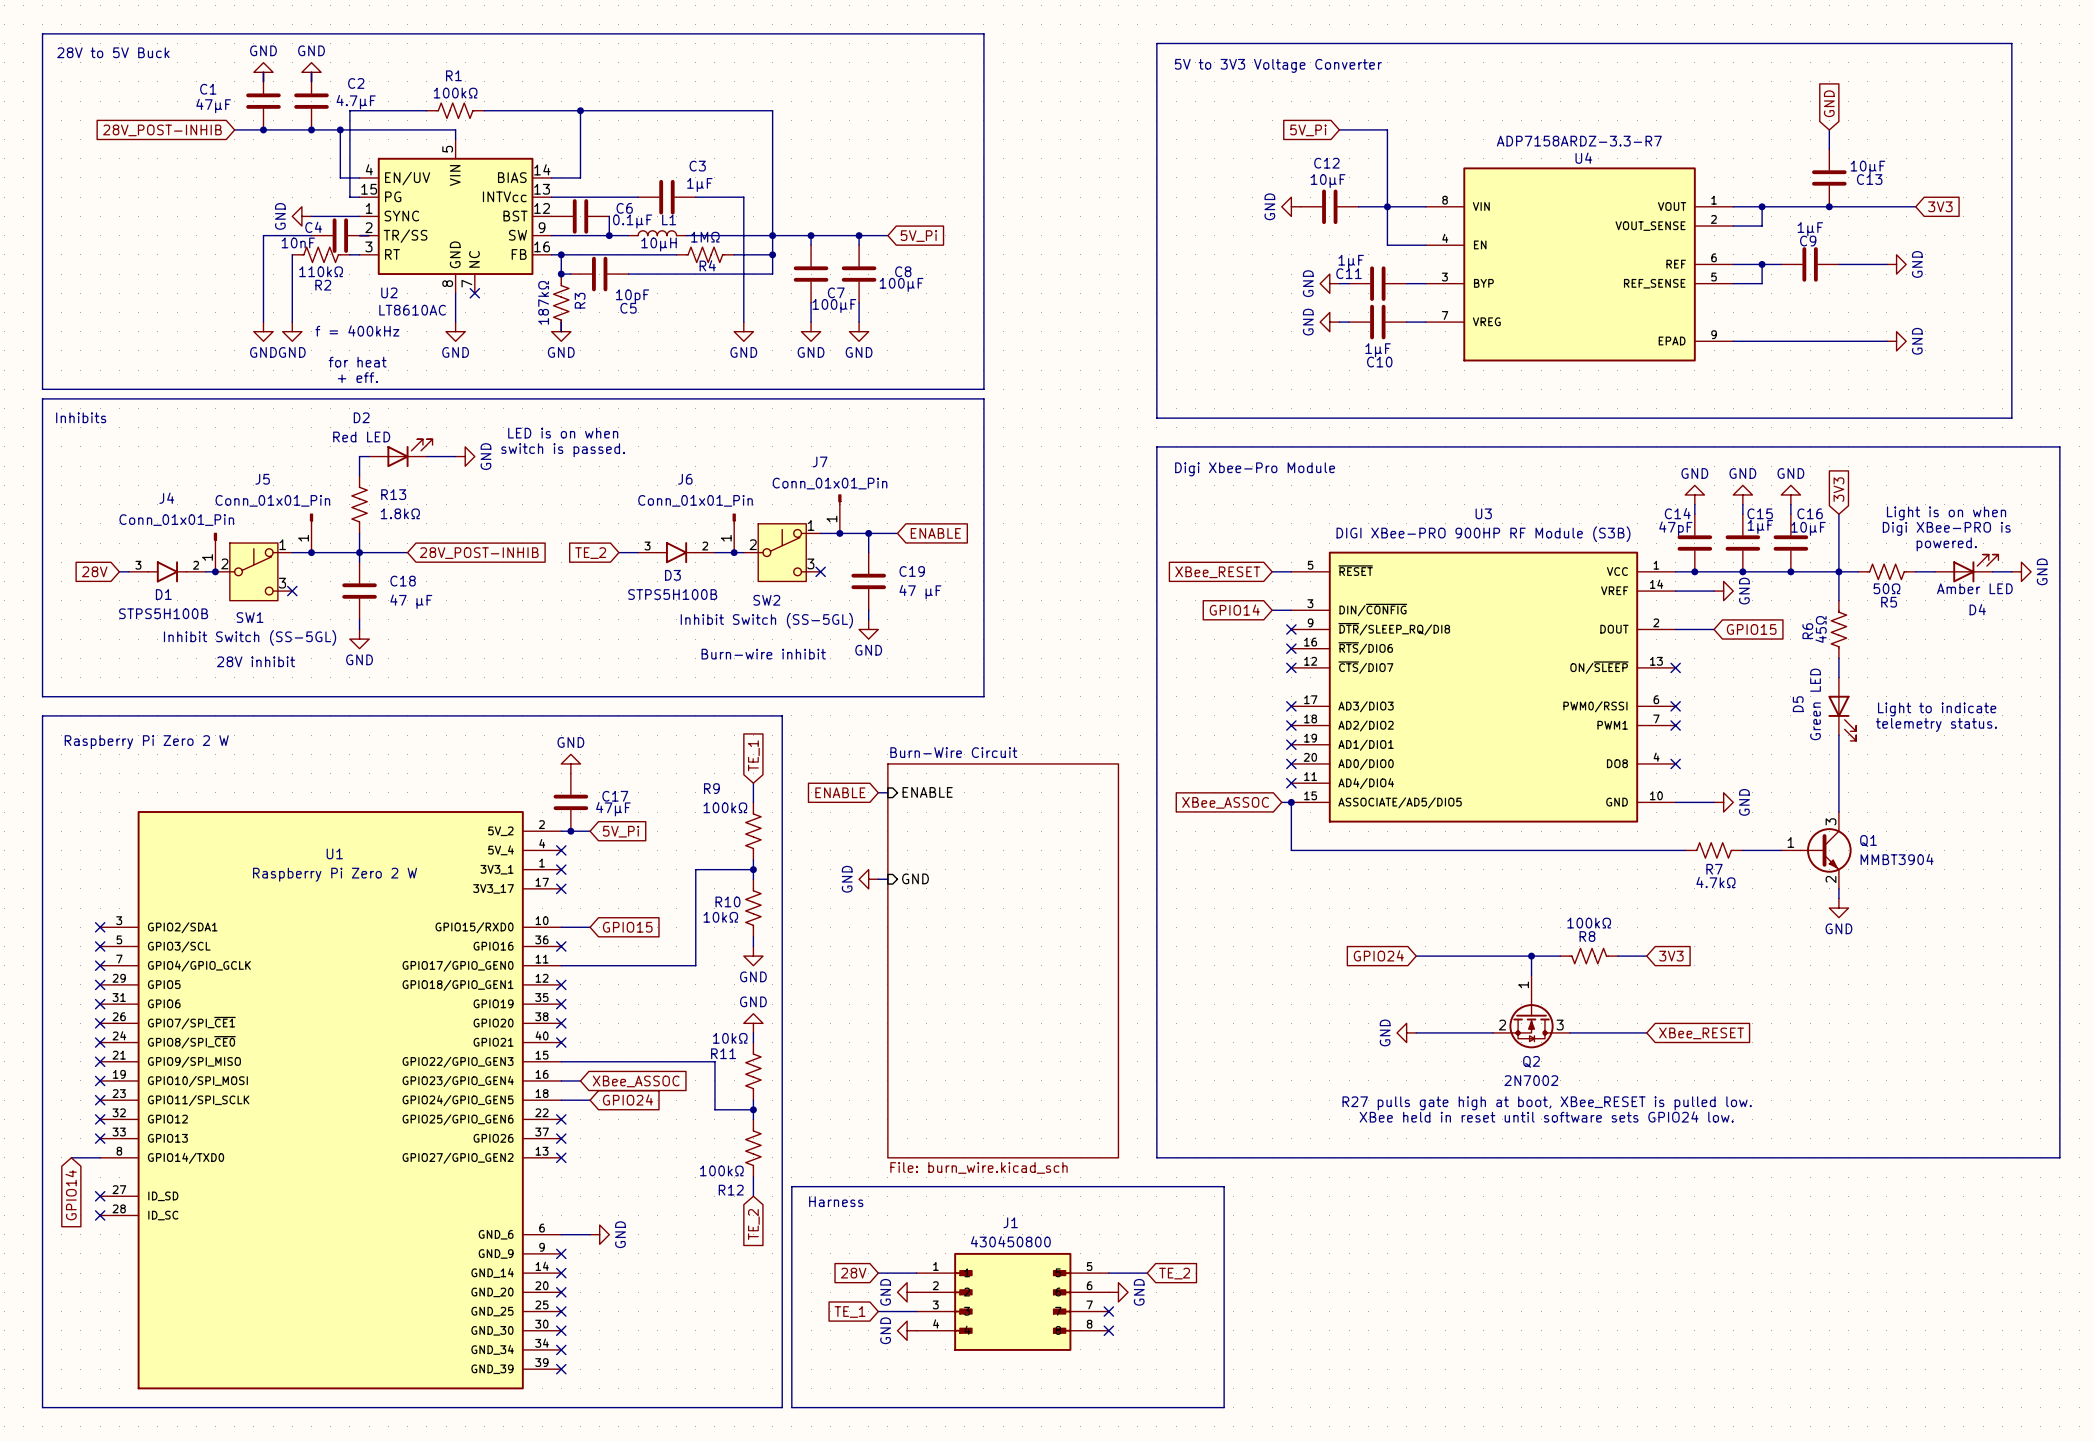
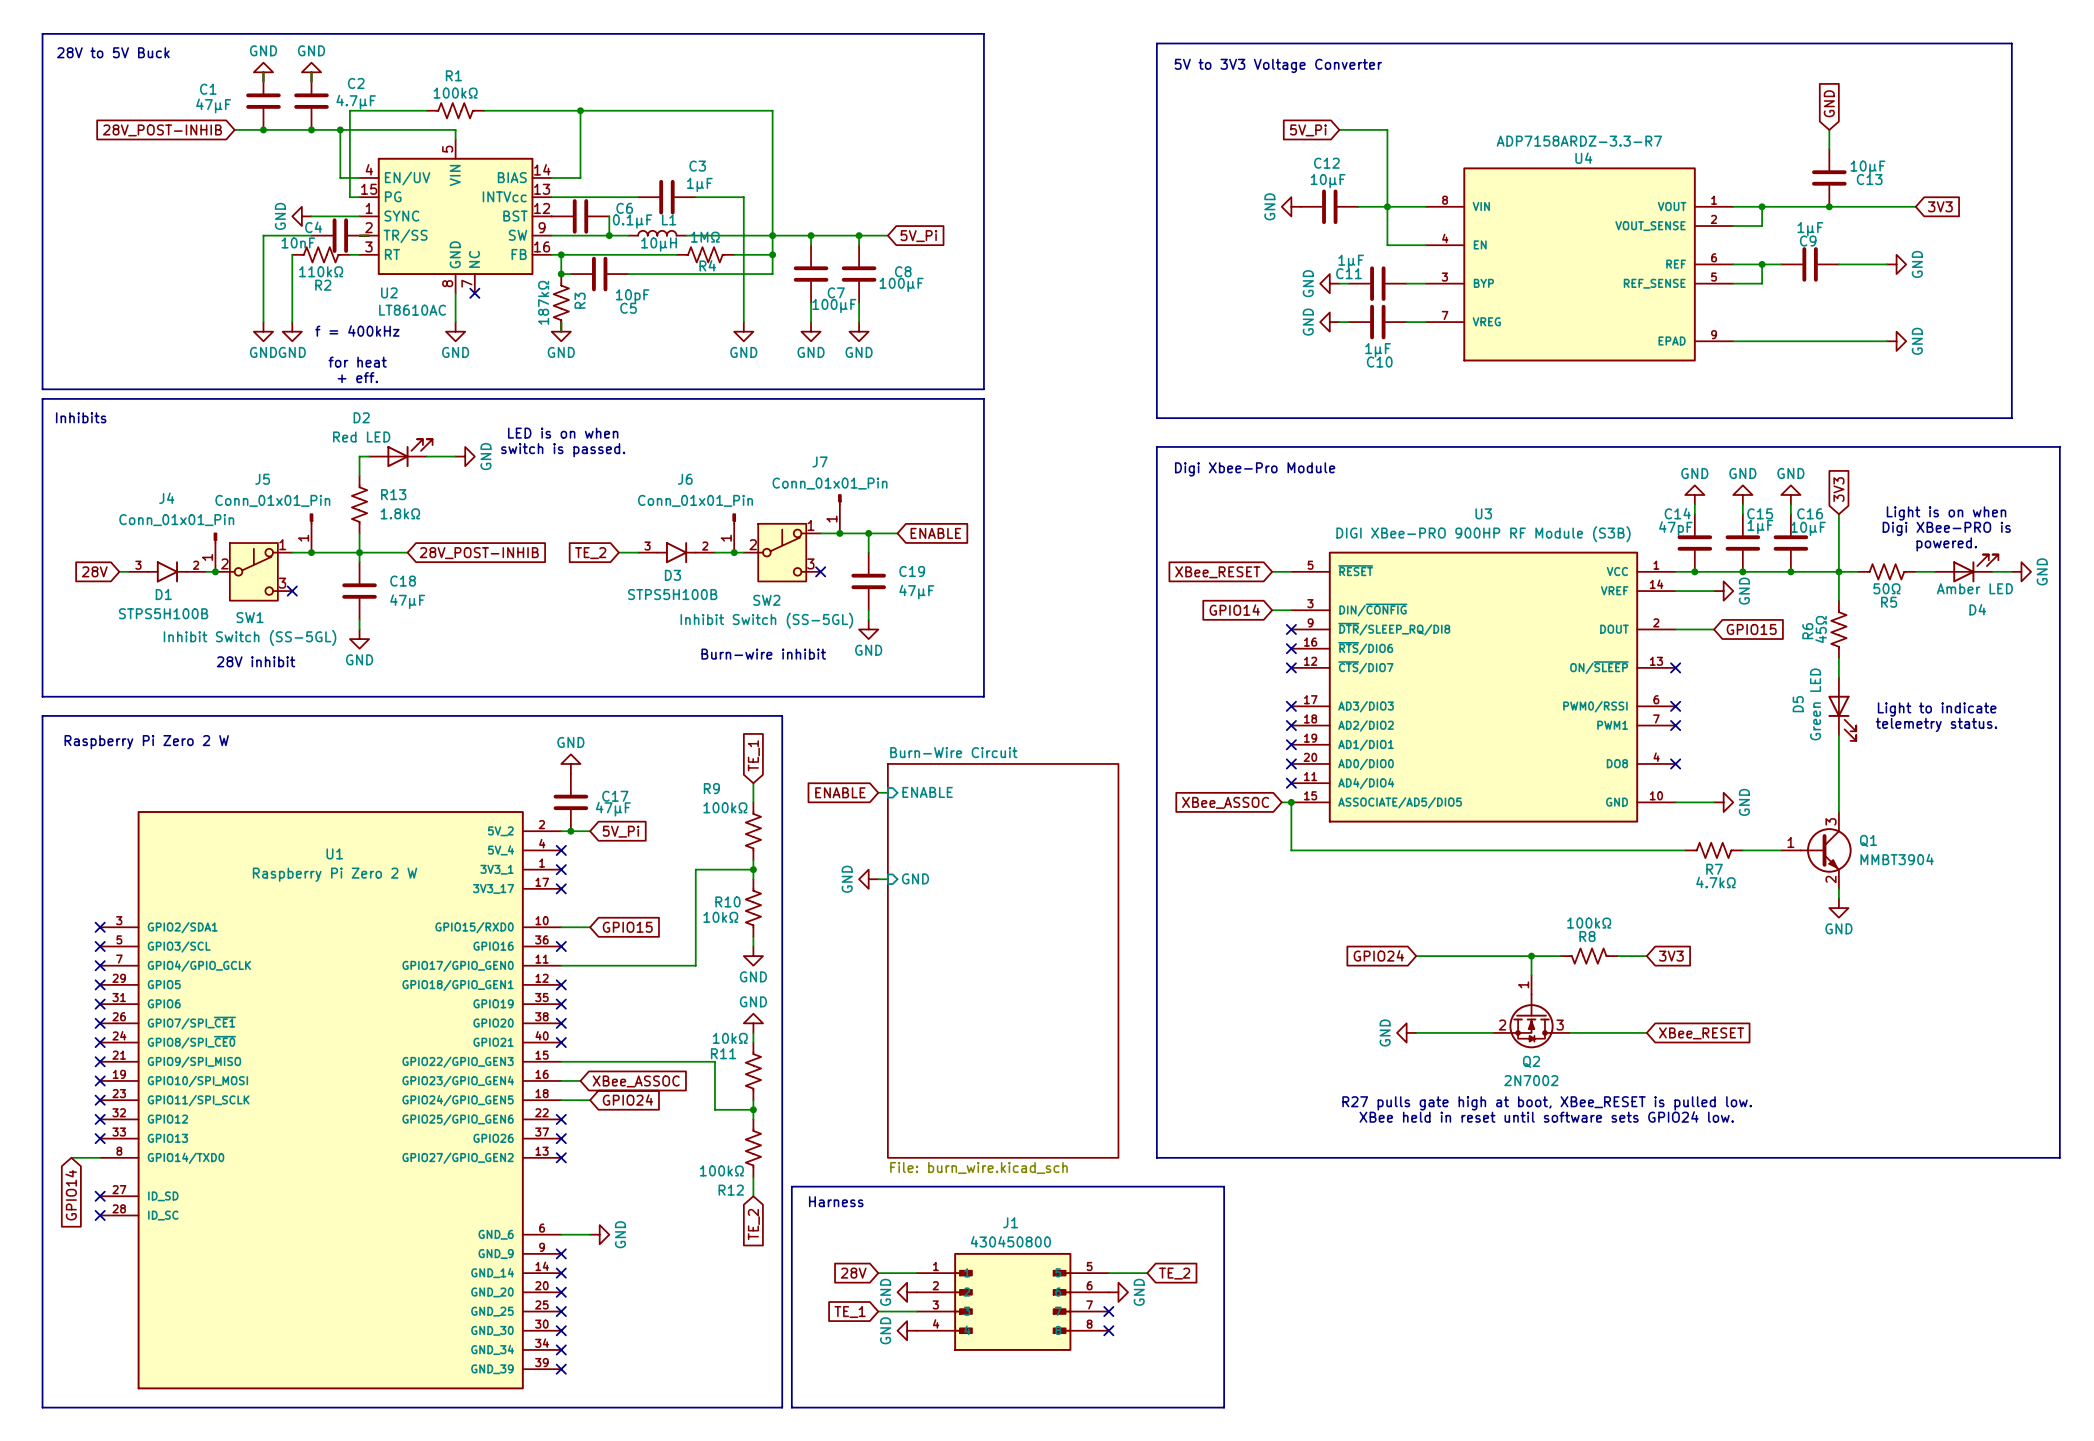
C19 value: 47 µF (920, 592) -> 47µF (916, 592)
C18 value: 47 µF (411, 601) -> 47µF (407, 601)

